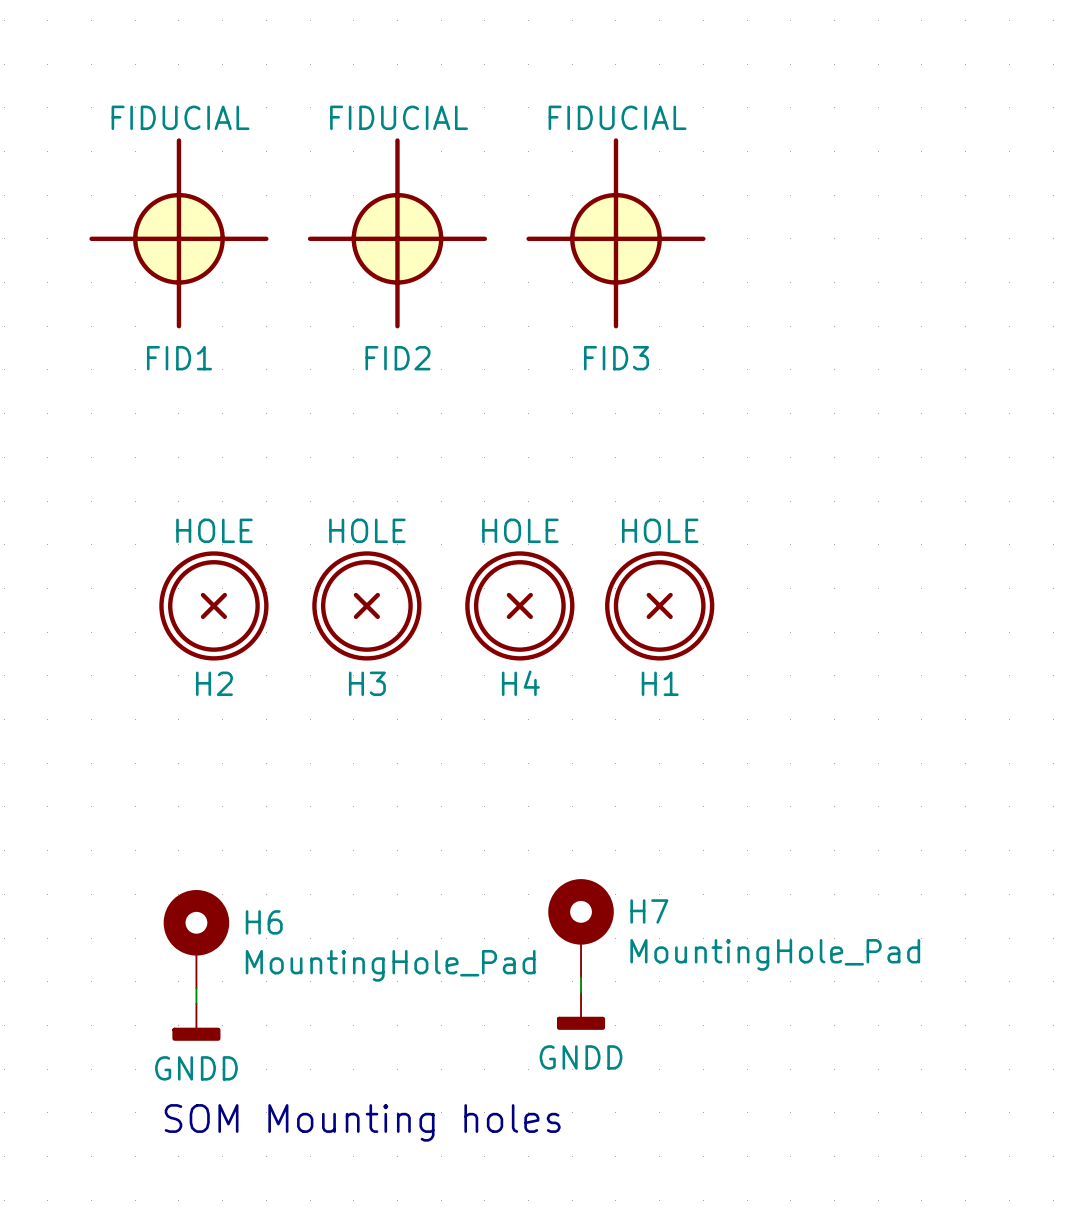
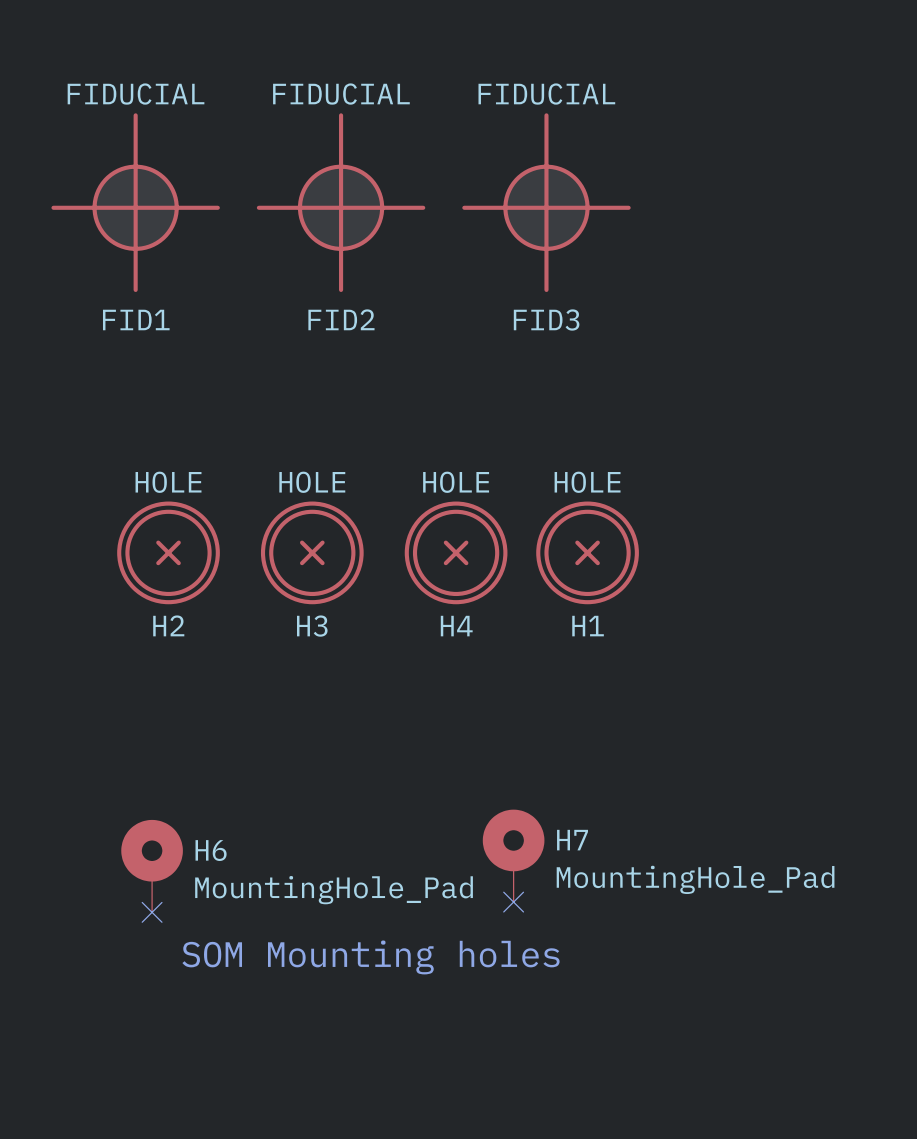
wire: (581, 977) (581, 992) -> none
no-connect mark: none -> (513, 902)
wire: (196, 988) (196, 1003) -> none
no-connect mark: none -> (152, 912)
power symbol: GNDD (581, 1011) -> none
power symbol: GNDD (196, 1022) -> none
text position: SOM Mounting holes (362, 1122) -> SOM Mounting holes (371, 957)

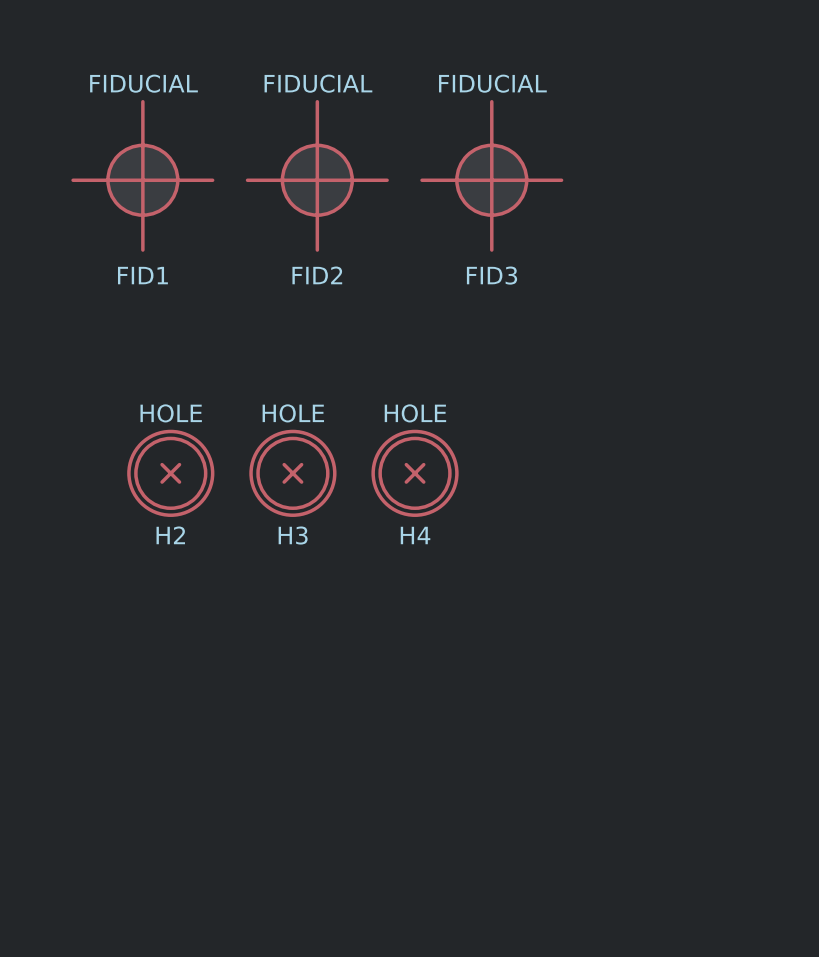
H1: HOLE (587, 552) -> none
H7: MountingHole_Pad (513, 855) -> none
H6: MountingHole_Pad (152, 866) -> none
no-connect mark: (513, 902) -> none
no-connect mark: (152, 912) -> none
text: SOM Mounting holes (371, 957) -> none

